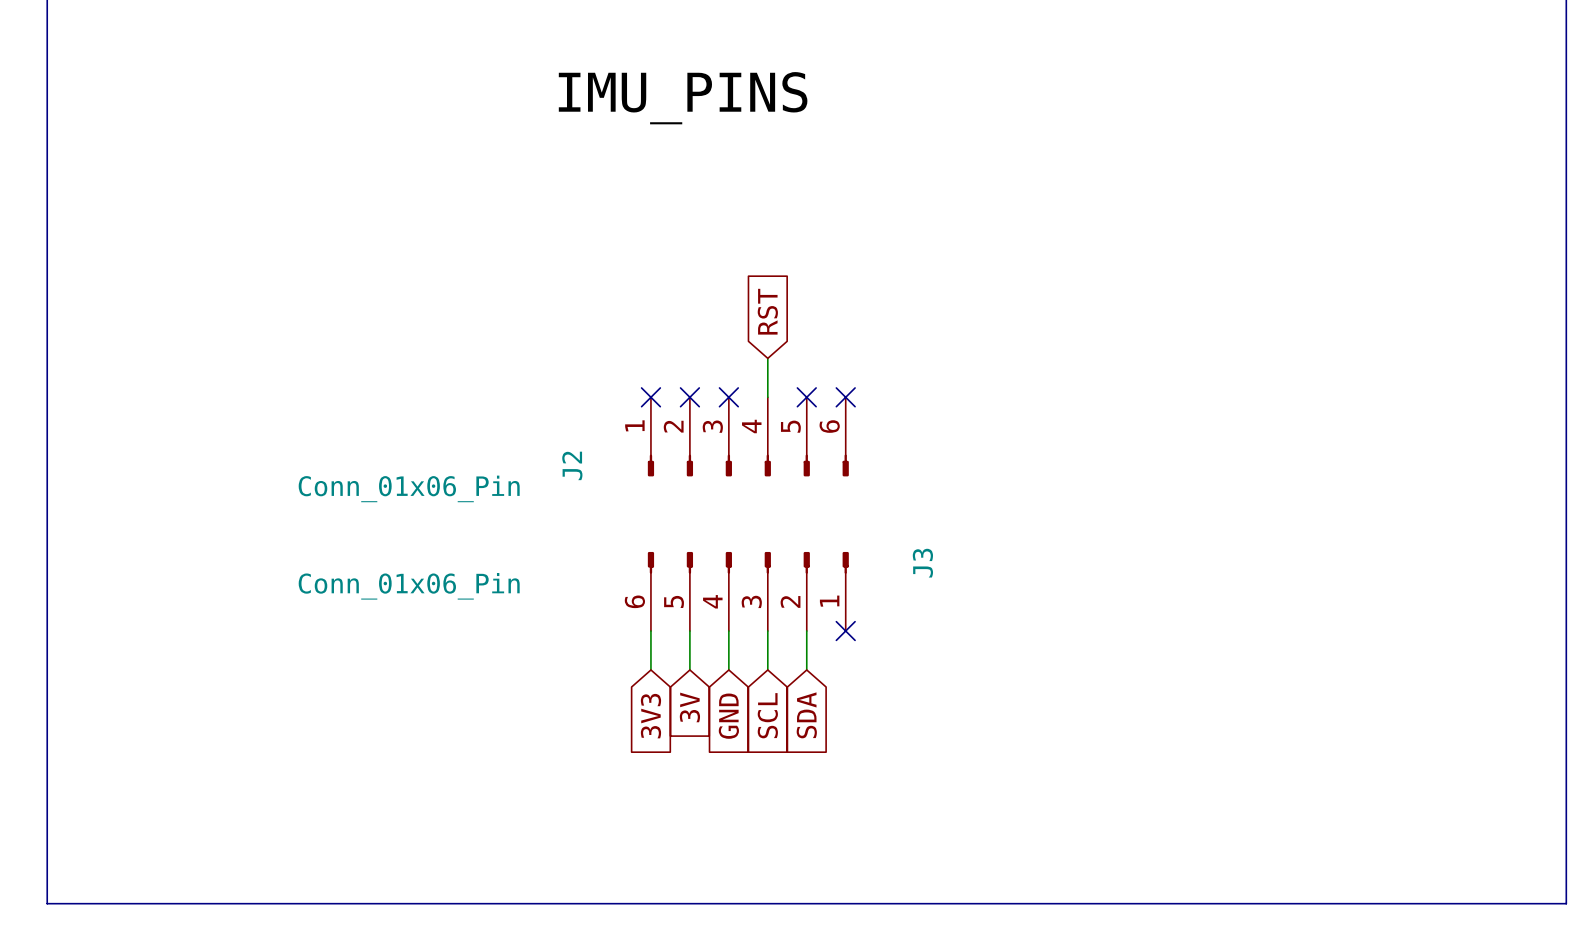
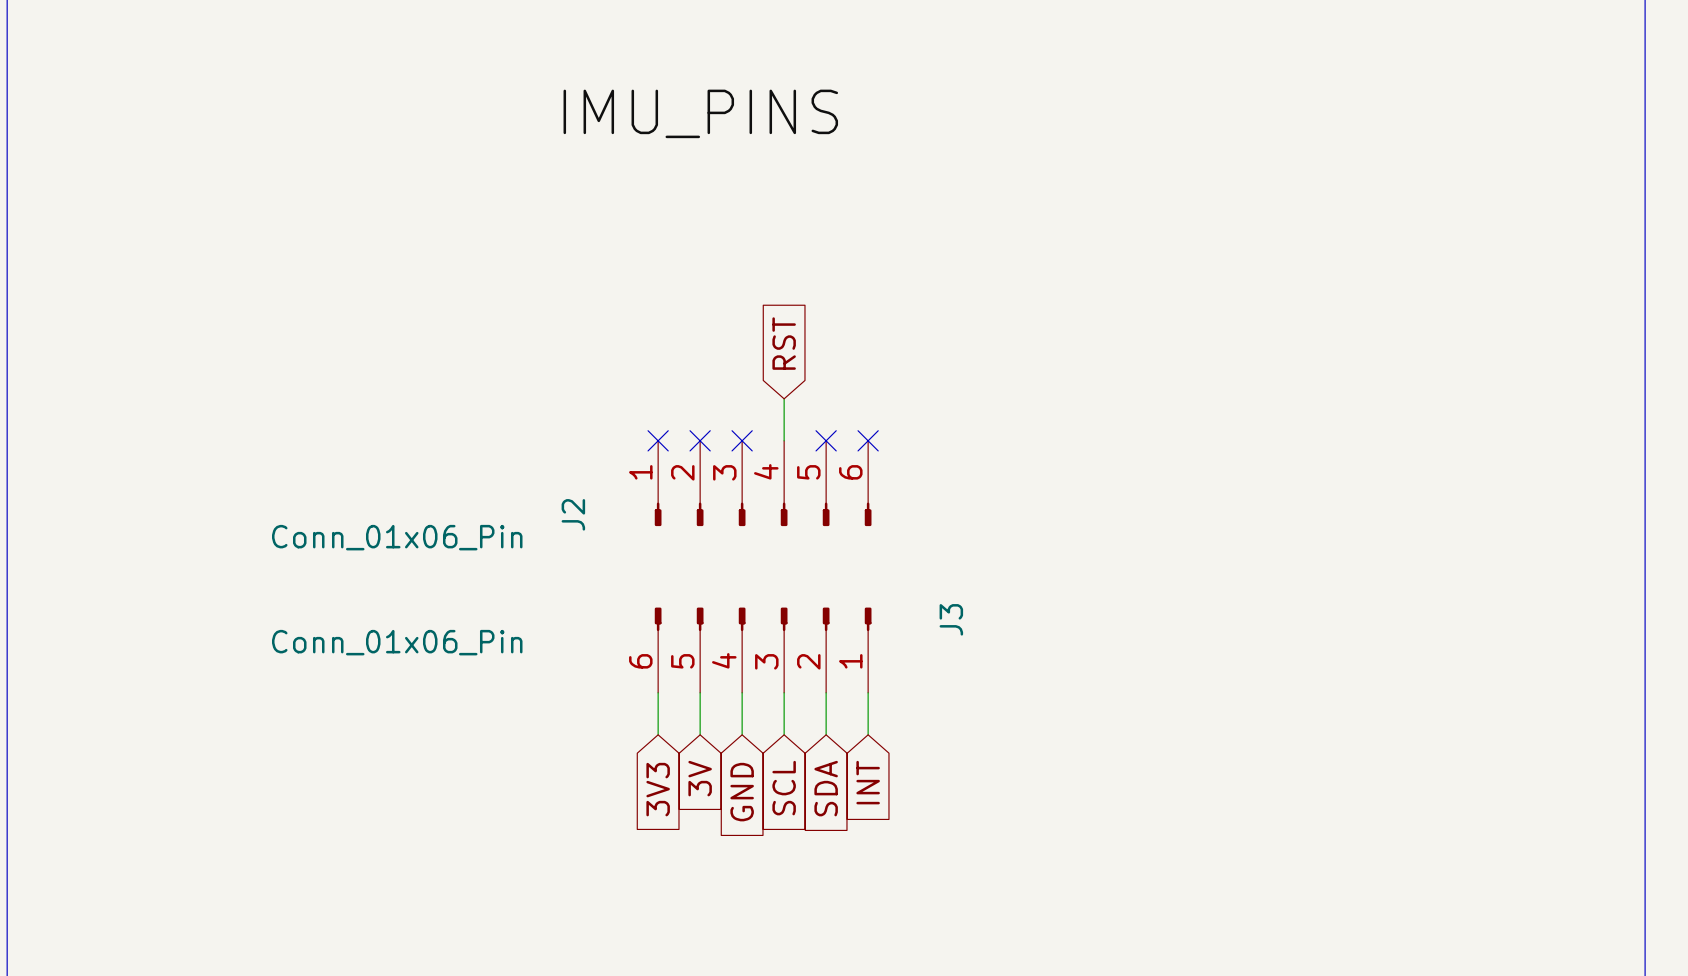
wire: none -> (868, 692) (868, 734)
no-connect mark: (845, 631) -> none
global label: none -> INT (868, 782)

